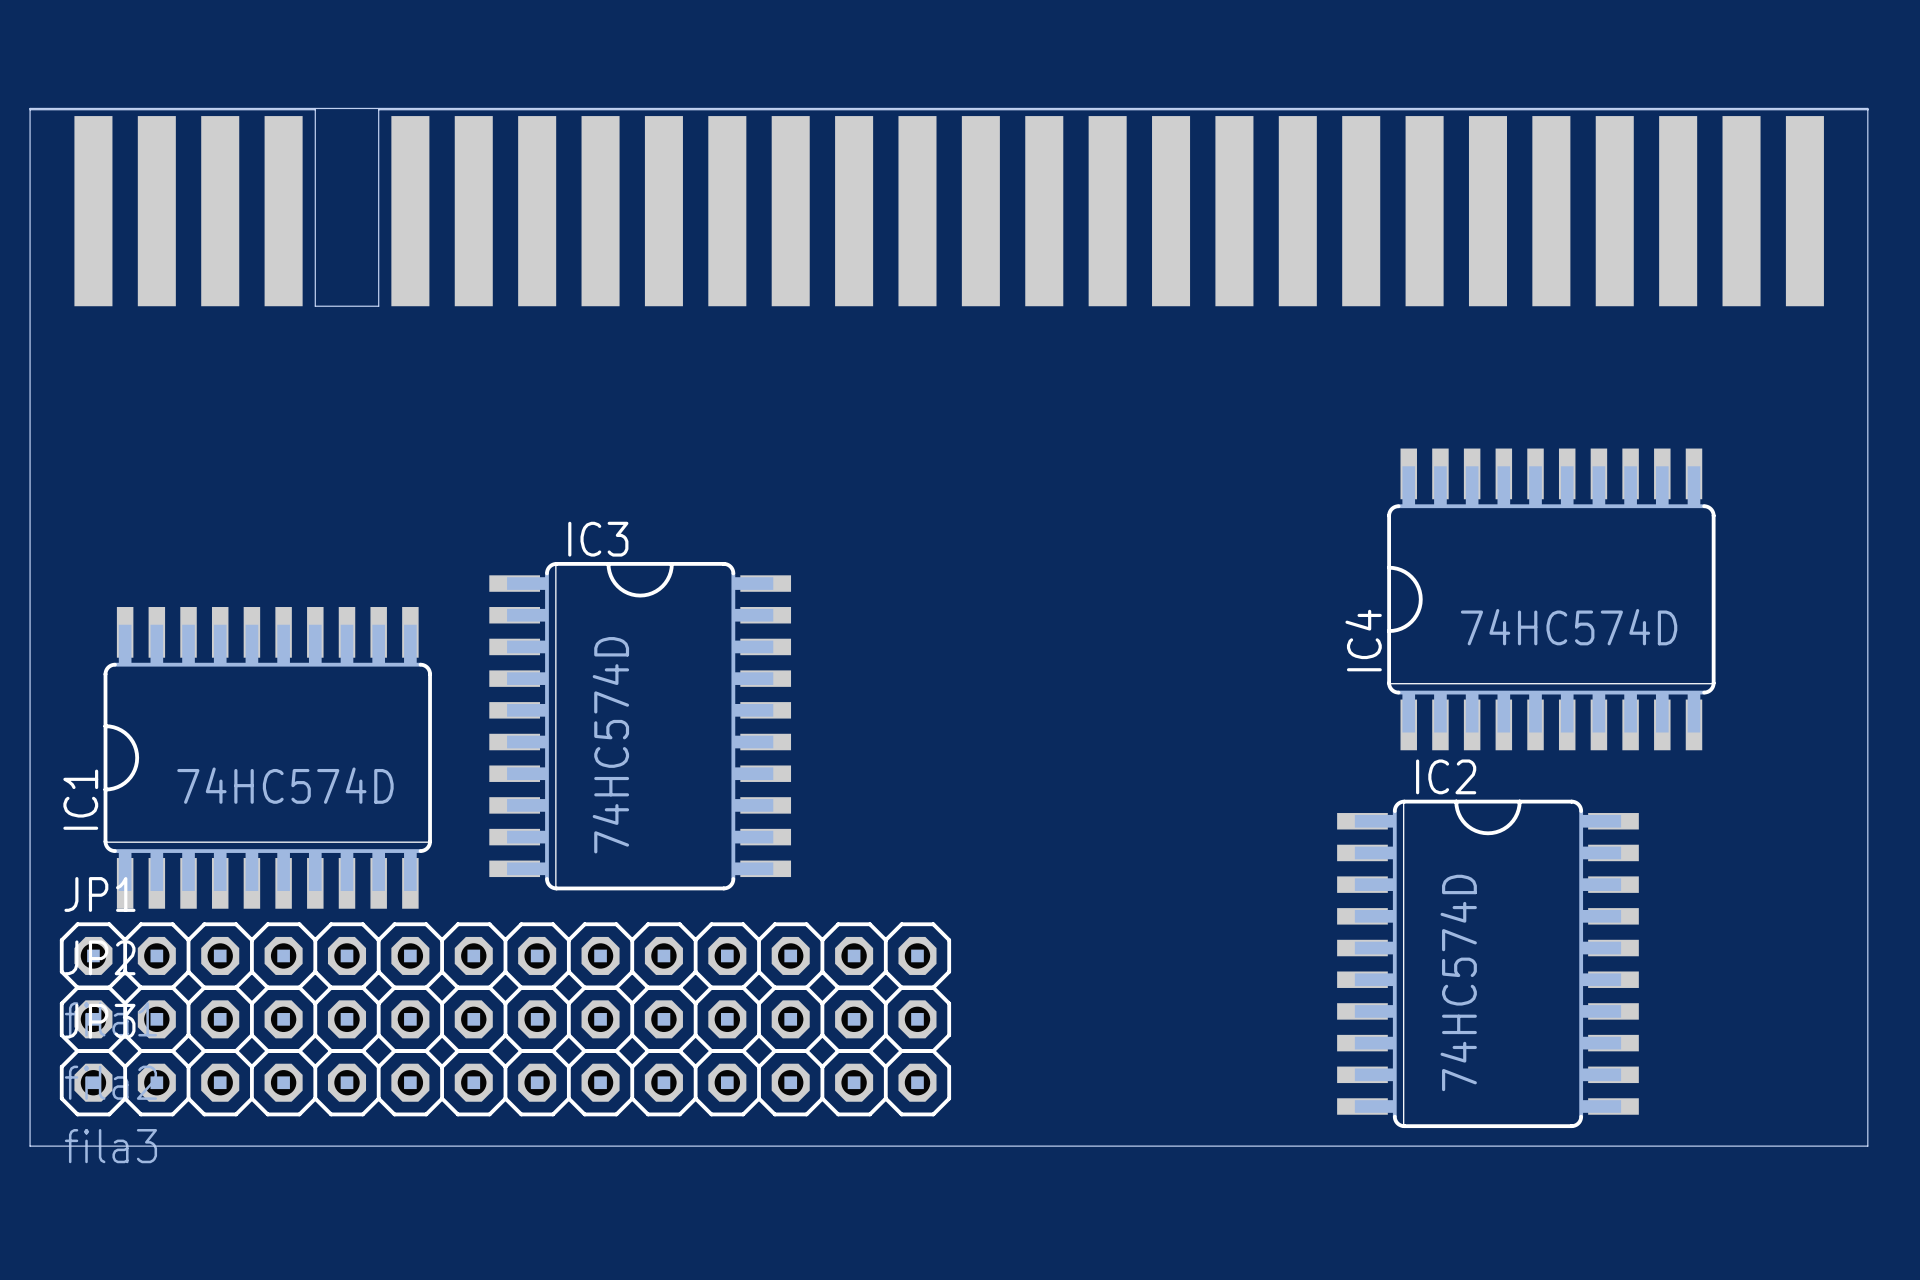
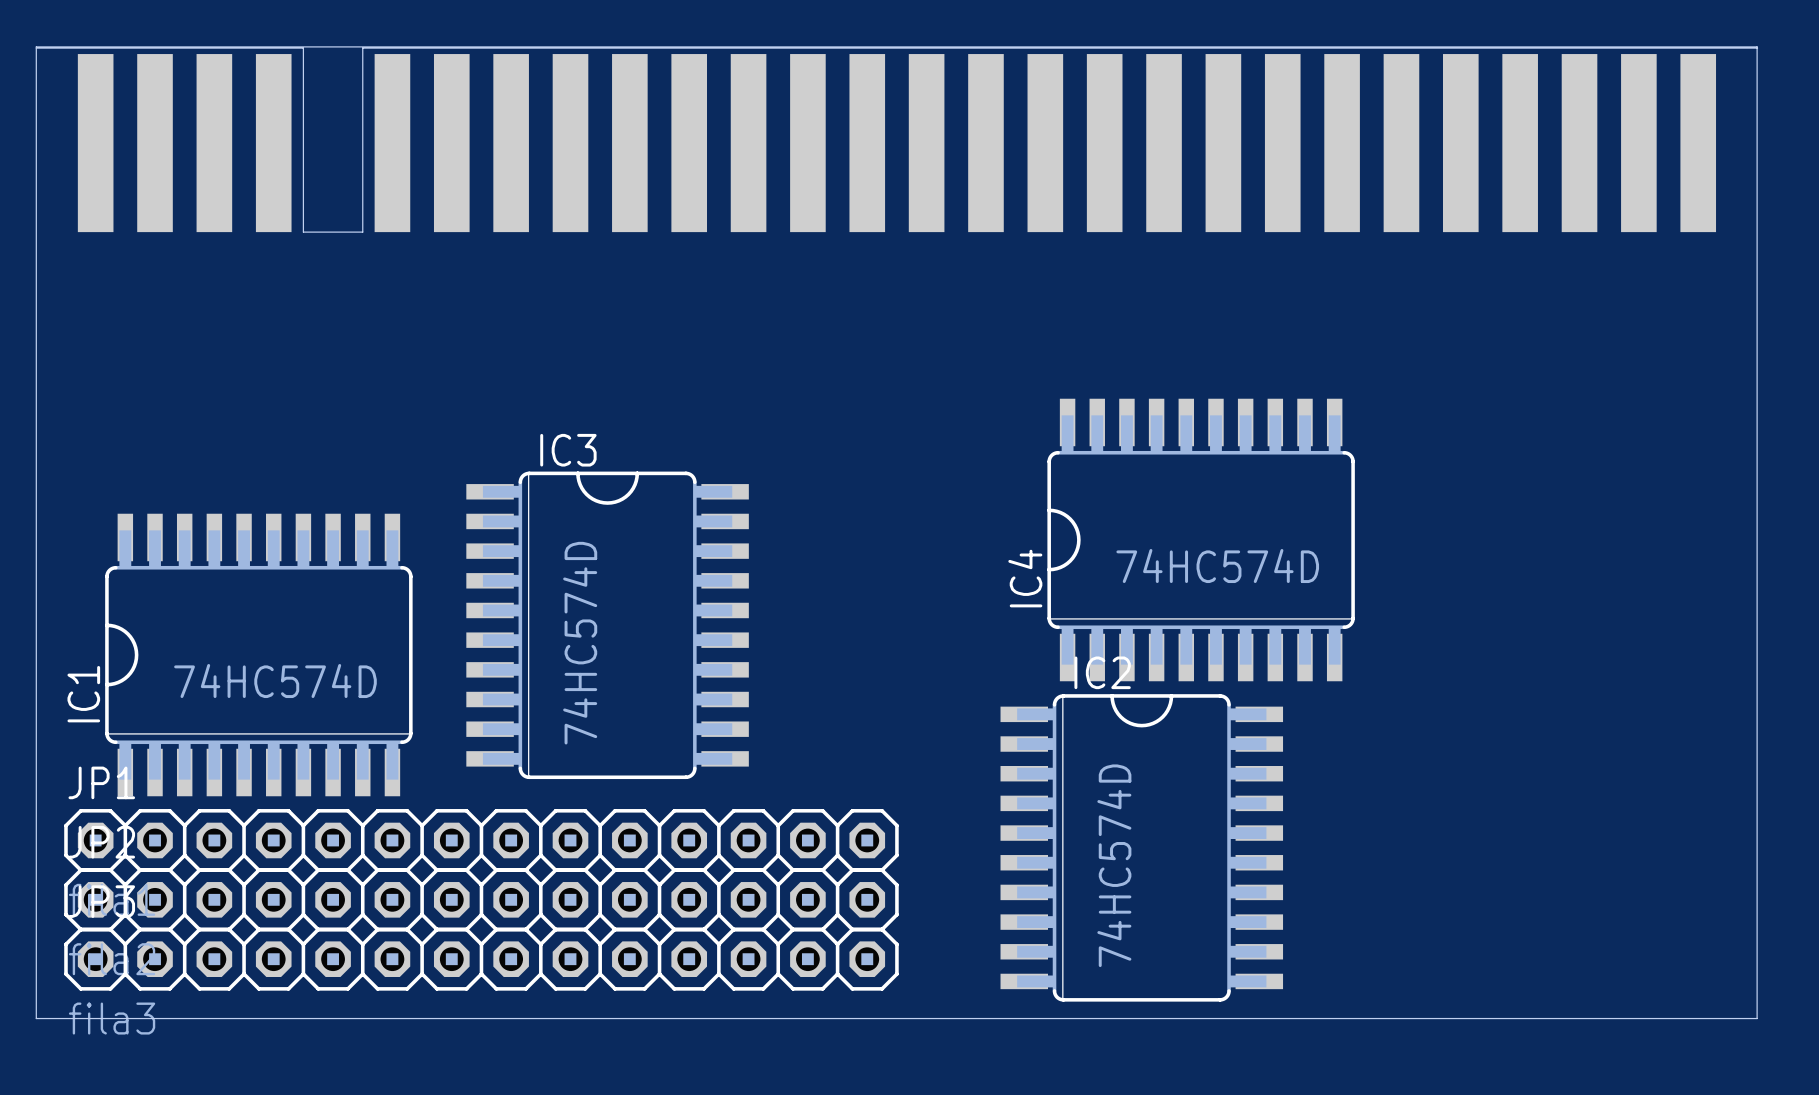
IC4 position: (1551, 599) -> (1201, 540)
IC2 position: (1487, 963) -> (1141, 847)

